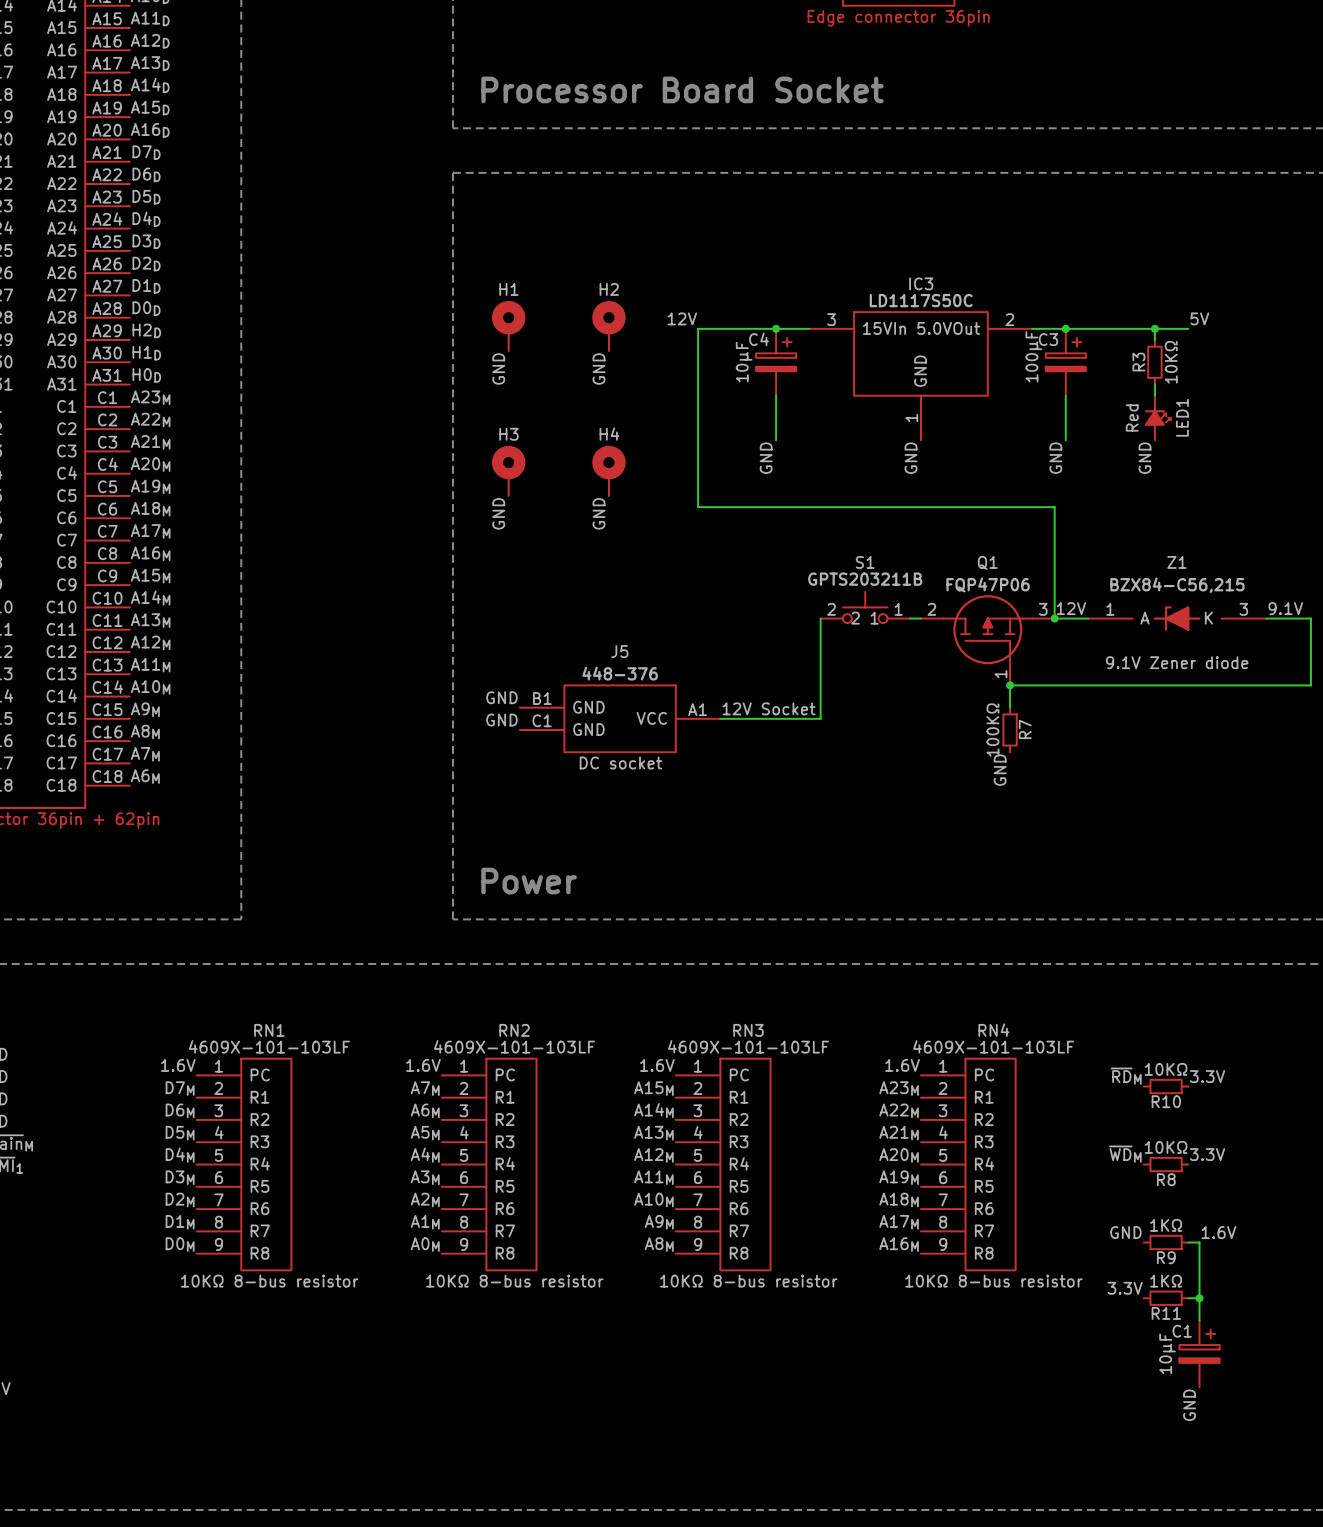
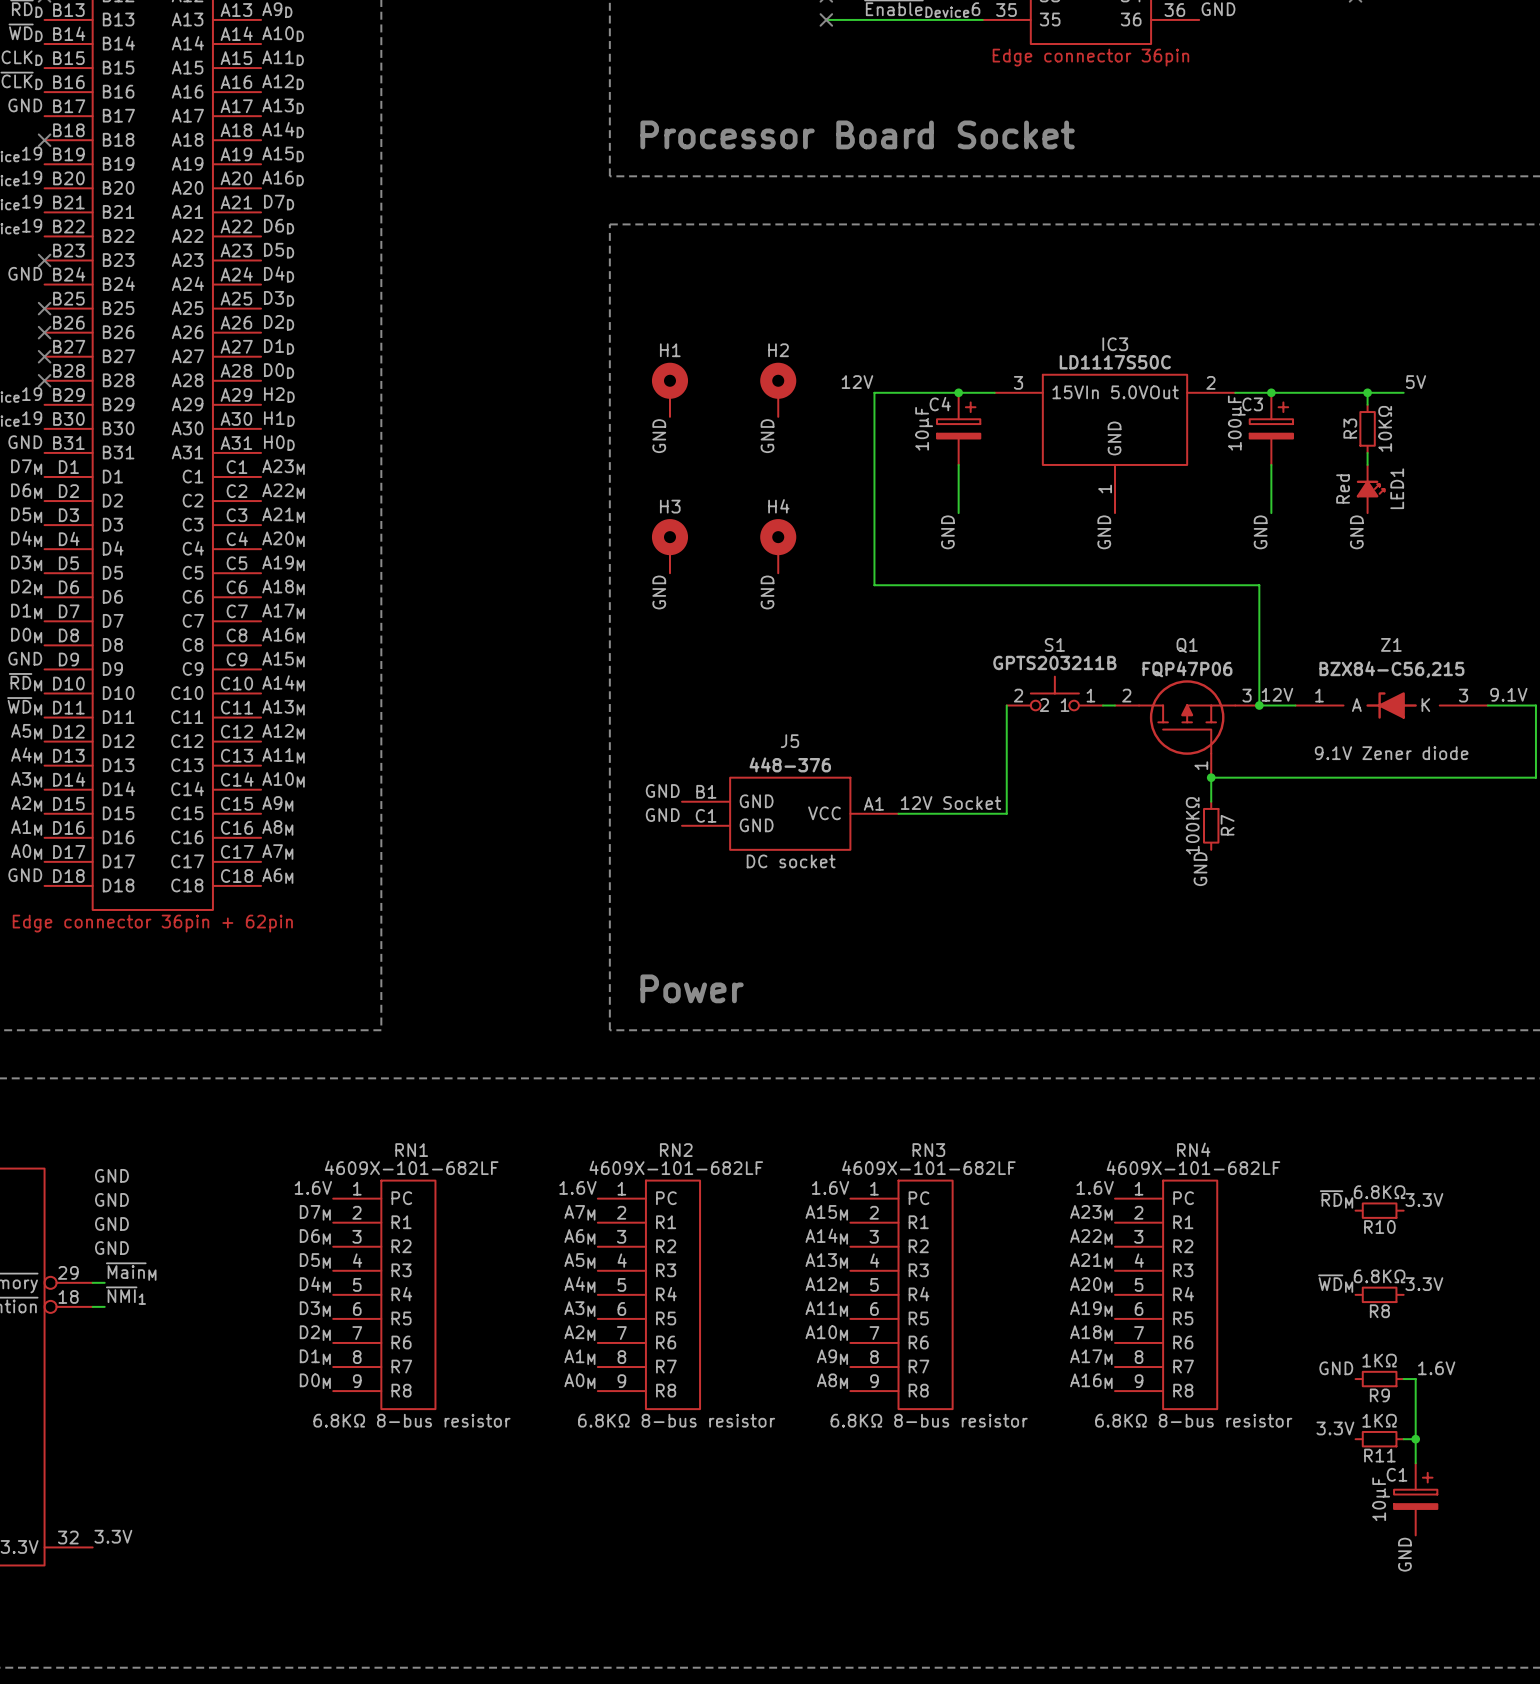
RN1 value: 4609X-101-103LF (269, 1046) -> 4609X-101-682LF (411, 1167)
RN2 value: 4609X-101-103LF (514, 1046) -> 4609X-101-682LF (676, 1167)
RN3 value: 4609X-101-103LF (748, 1046) -> 4609X-101-682LF (928, 1167)
RN4 value: 4609X-101-103LF (993, 1046) -> 4609X-101-682LF (1193, 1167)
R10 value: 10KΩ (1166, 1069) -> 6.8KΩ (1379, 1192)
R8 value: 10KΩ (1166, 1147) -> 6.8KΩ (1379, 1276)
RN1 text: 10KΩ 8-bus resistor (269, 1281) -> 6.8KΩ 8-bus resistor (411, 1420)
RN2 text: 10KΩ 8-bus resistor (514, 1281) -> 6.8KΩ 8-bus resistor (676, 1420)
RN3 text: 10KΩ 8-bus resistor (748, 1281) -> 6.8KΩ 8-bus resistor (929, 1420)
RN4 text: 10KΩ 8-bus resistor (993, 1281) -> 6.8KΩ 8-bus resistor (1193, 1420)

